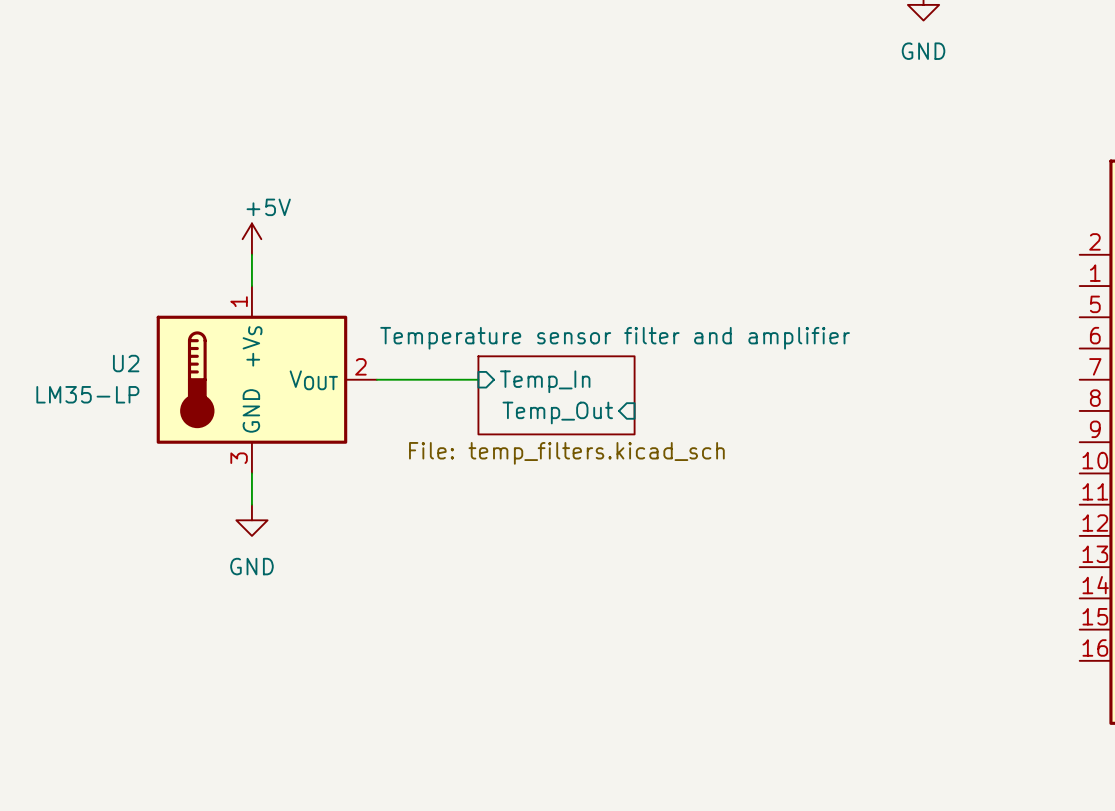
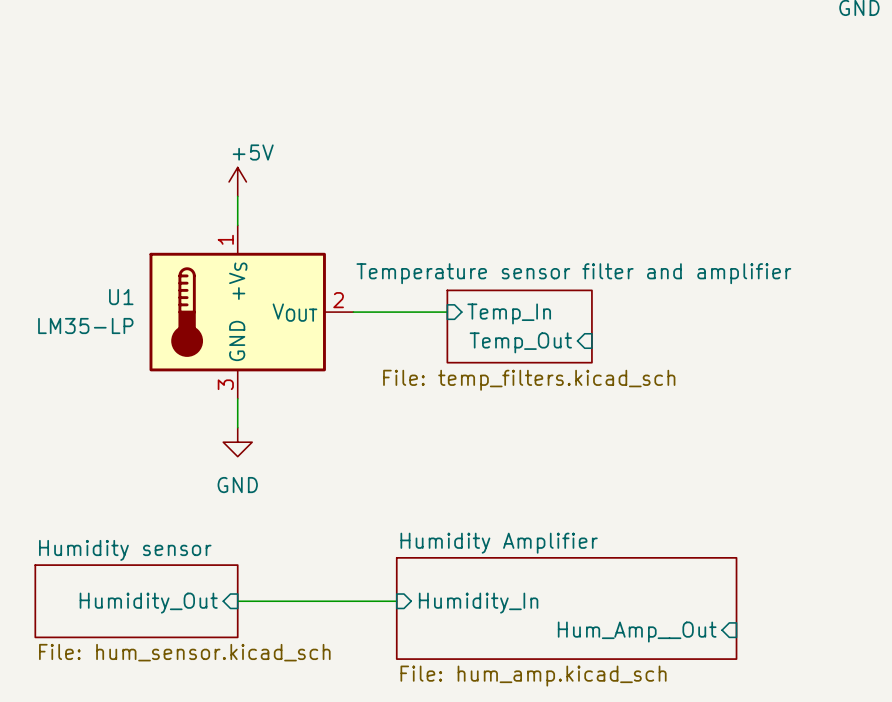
U2 name: U2 (126, 363) -> U1 (121, 297)
sheet Humidity sensor: none -> File: hum_sensor.kicad_sch (136, 601)
wire: none -> (237, 601) (396, 601)
sheet pin: none -> Humidity_Out (148, 603)
sheet pin: none -> Humidity_In (478, 603)
sheet Humidity Amplifier: none -> File: hum_amp.kicad_sch (566, 608)
sheet pin: none -> Hum_Amp__Out (637, 632)

